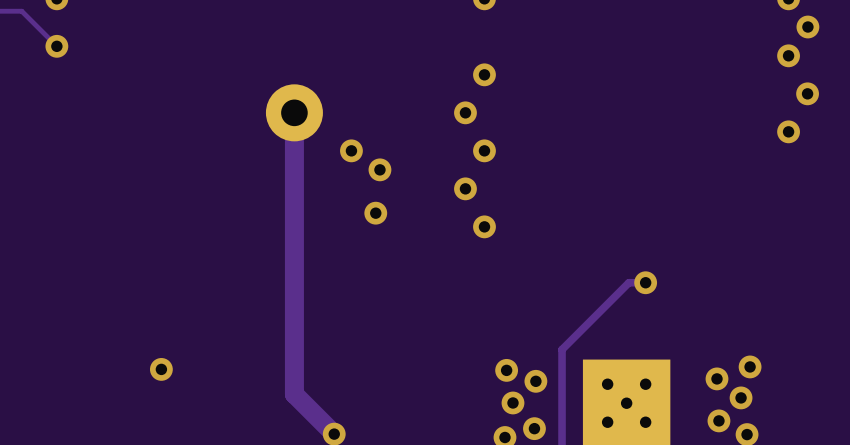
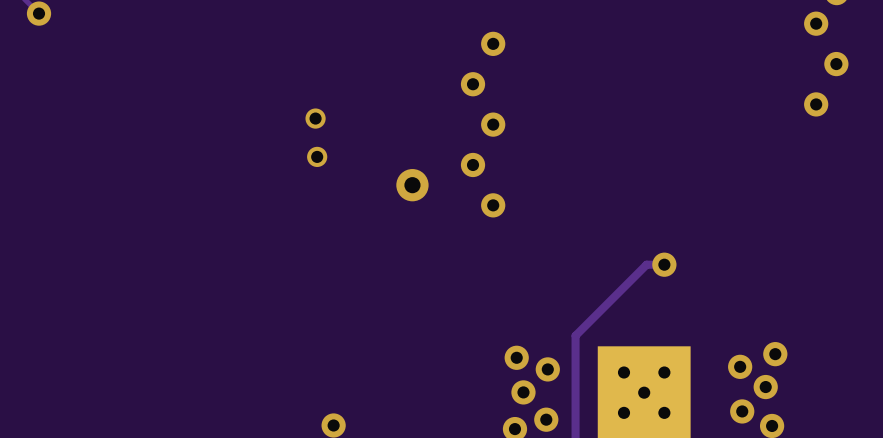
track: (294, 112) (294, 394) (334, 434) -> none
part: (294, 112) -> none
via: none -> (315, 118)
via: (351, 150) -> none
via: (379, 169) -> none
via: none -> (317, 156)
via: none -> (412, 185)
via: (375, 213) -> none
via: (161, 369) -> none

